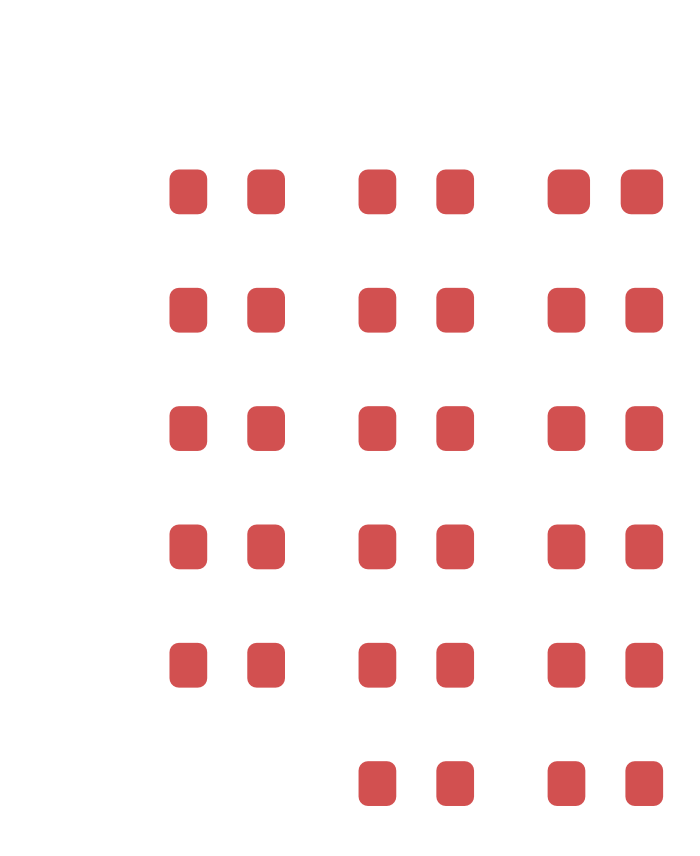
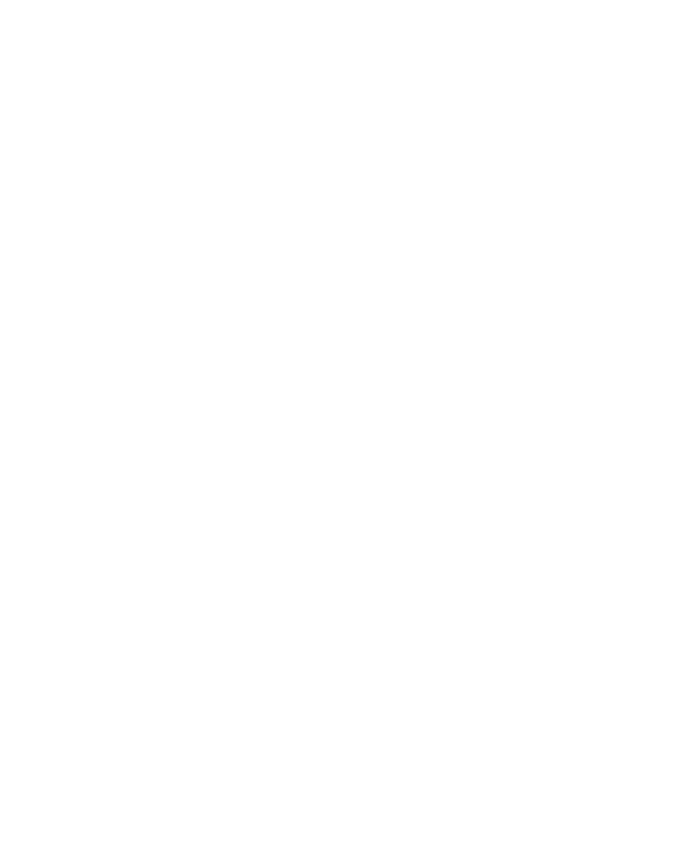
part: (227, 191) -> none
part: (416, 191) -> none
part: (605, 191) -> none
part: (227, 310) -> none
part: (416, 310) -> none
part: (605, 310) -> none
part: (227, 428) -> none
part: (416, 428) -> none
part: (605, 428) -> none
part: (227, 546) -> none
part: (416, 546) -> none
part: (605, 546) -> none
part: (227, 665) -> none
part: (416, 665) -> none
part: (605, 665) -> none
part: (416, 783) -> none
part: (605, 783) -> none

